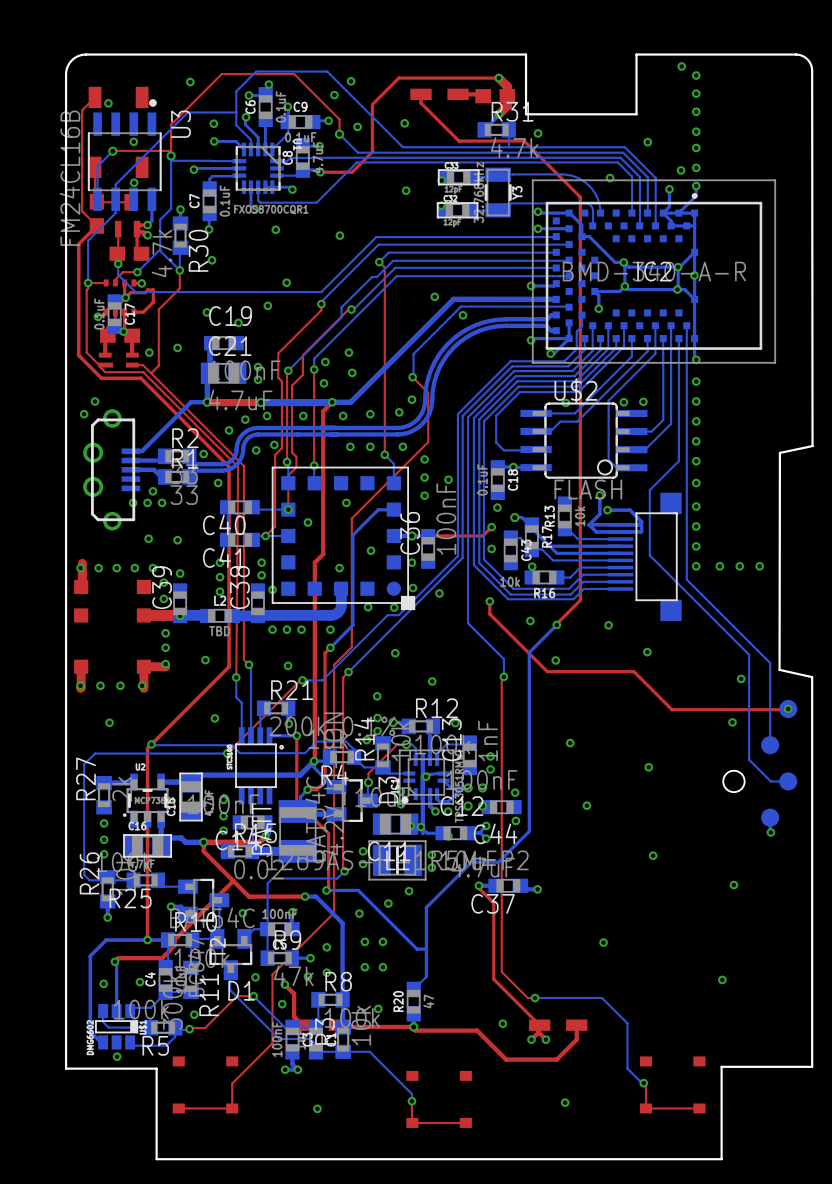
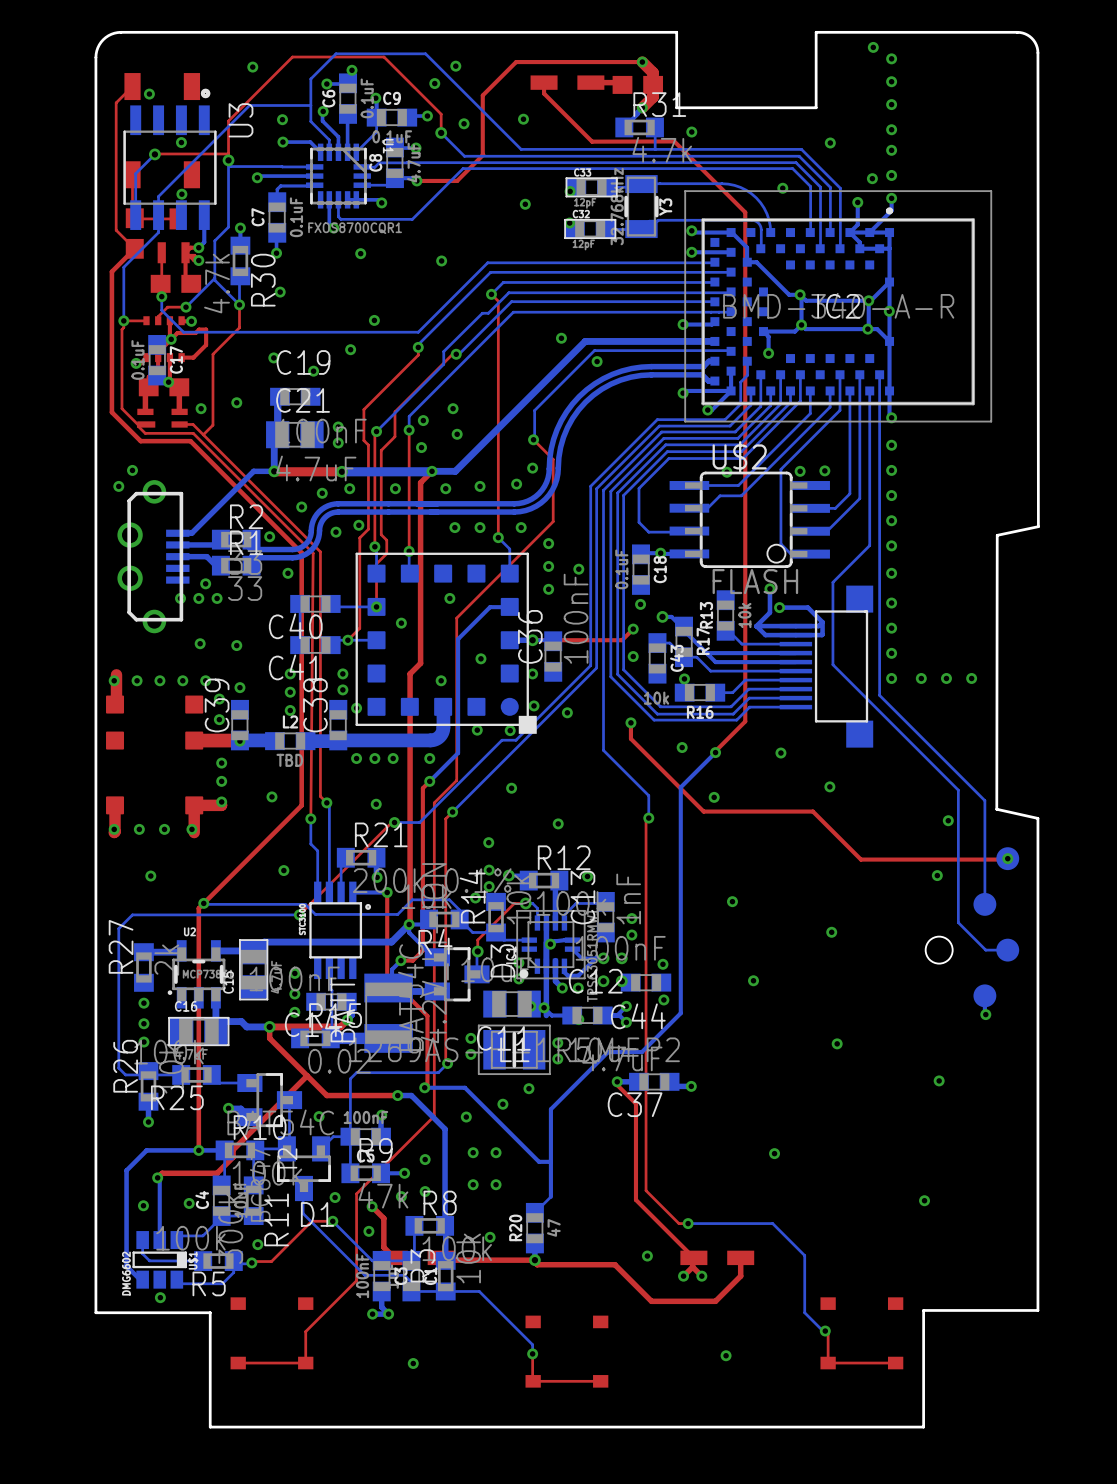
U3 value: FM24CL16B (69, 178) -> none

